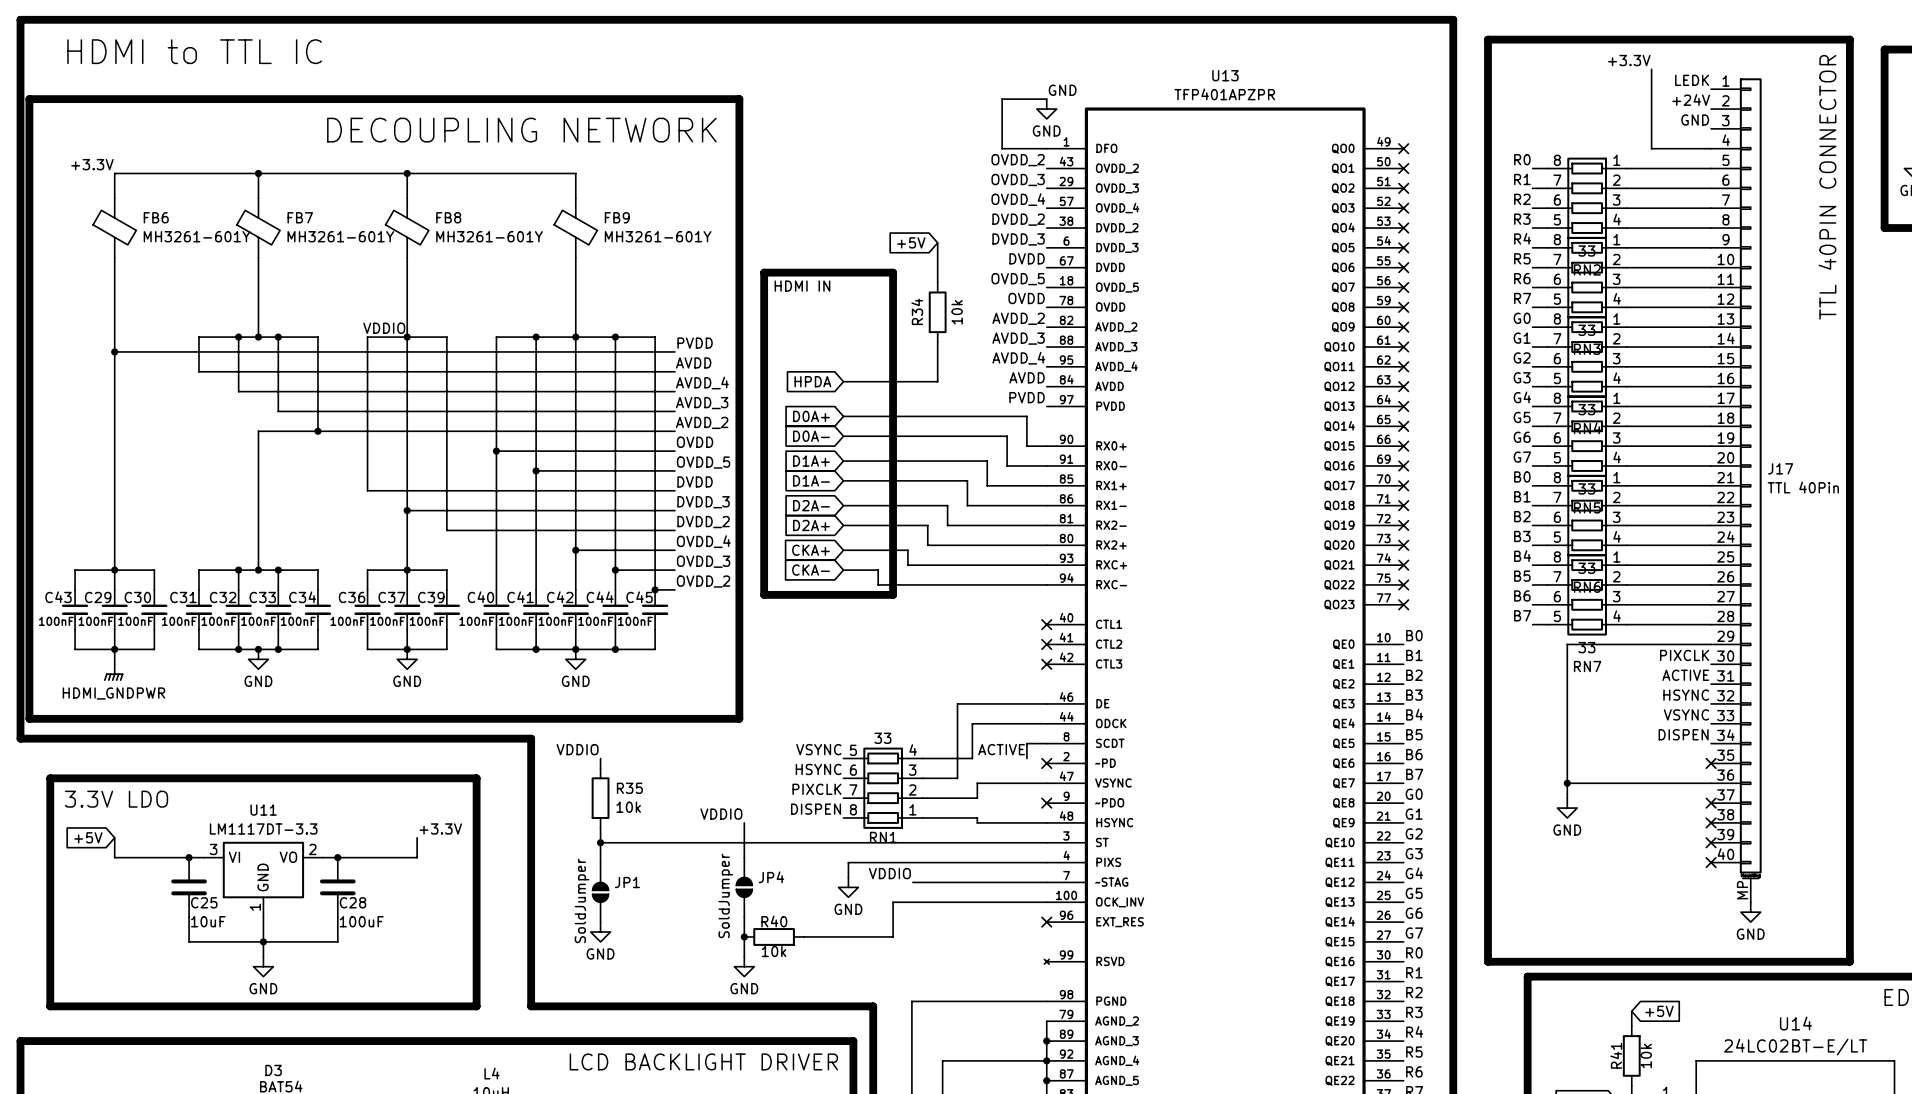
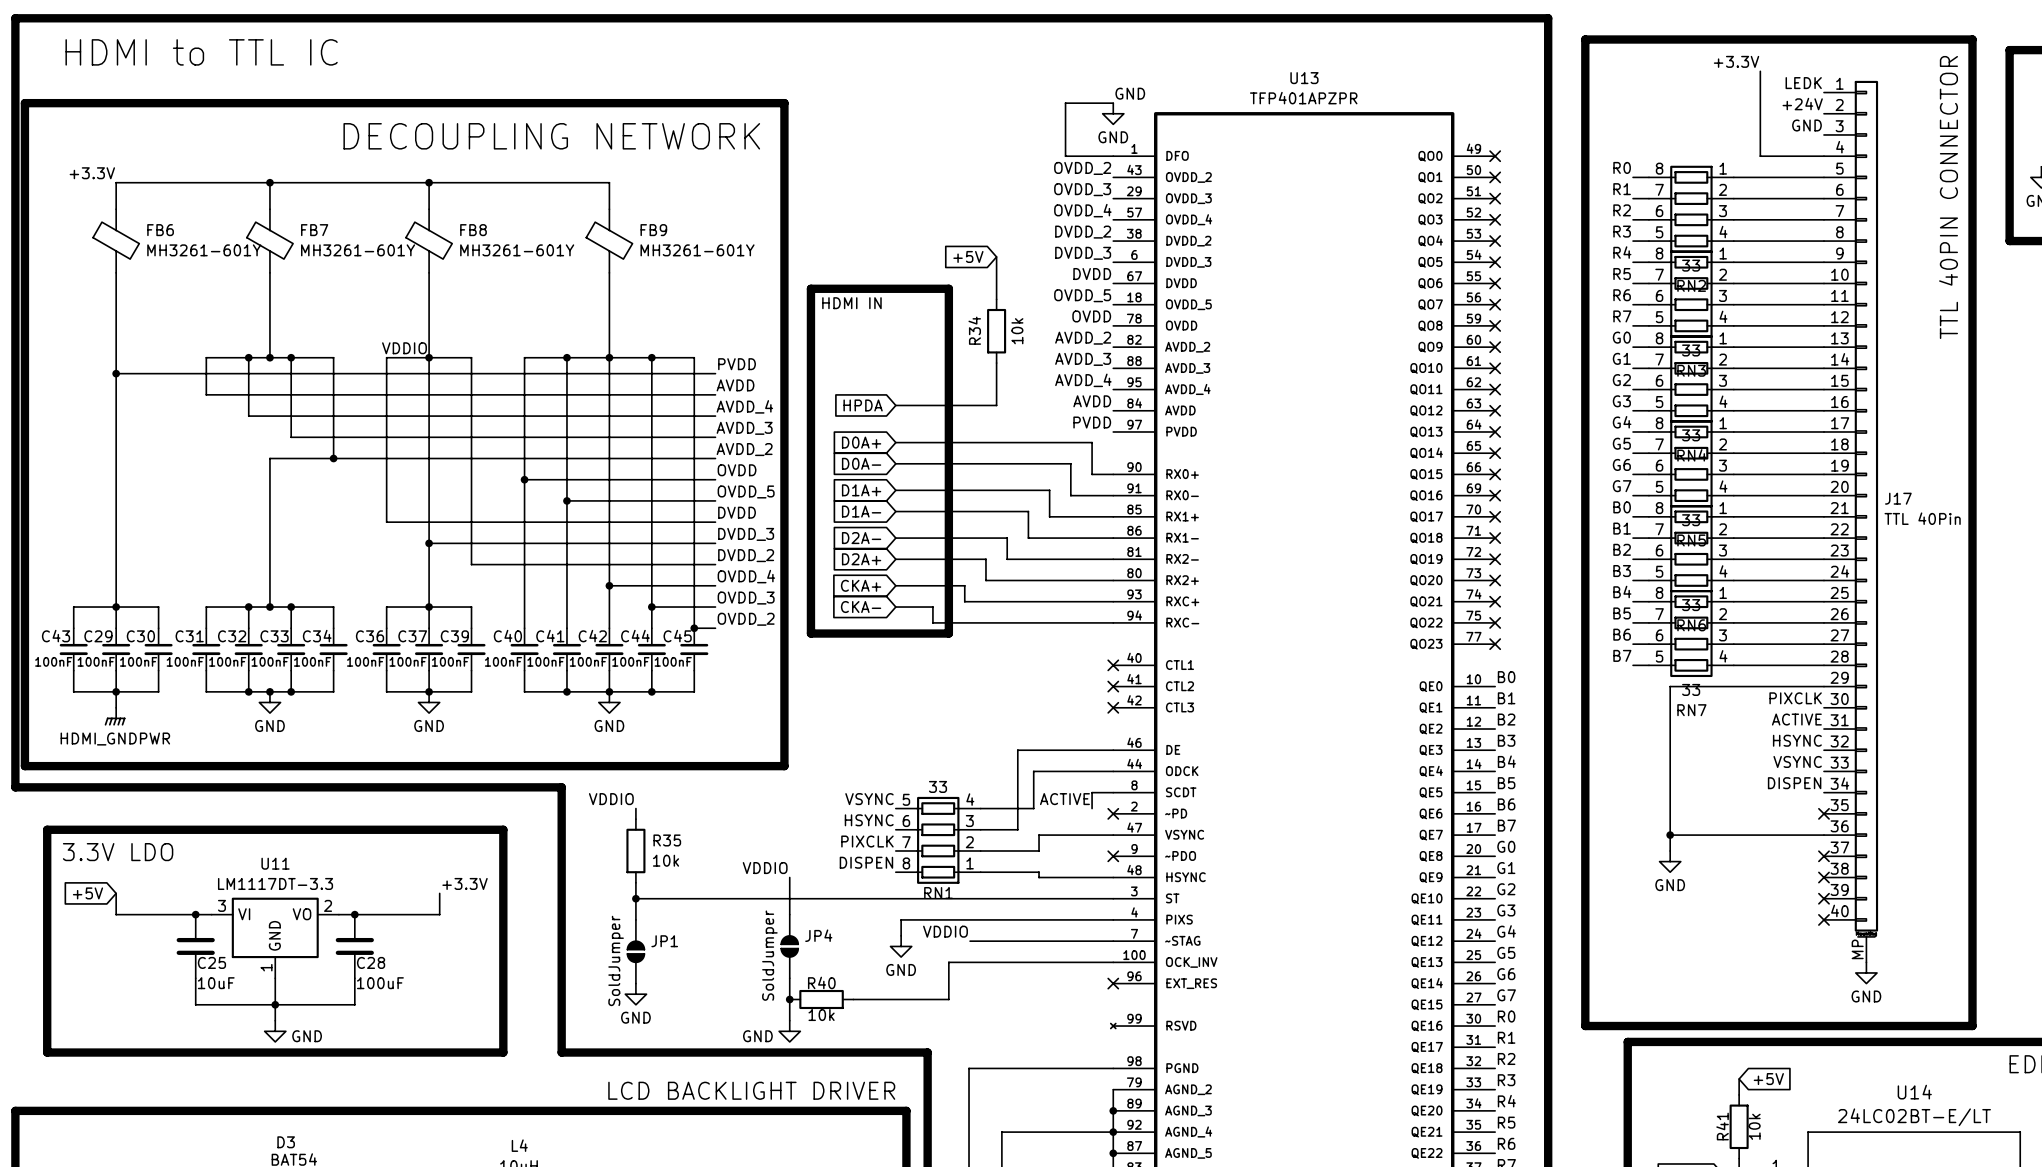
line: (50, 986) (50, 1006) (476, 1006) (476, 986) -> (47, 1052) (503, 1052)
line: (531, 986) (531, 1006) (873, 1006) -> (561, 1052) (927, 1052) (927, 1073)
power symbol text position: GND (263, 988) -> GND (307, 1036)
power symbol text position: GND (744, 988) -> GND (757, 1036)
text position: LCD BACKLIGHT DRIVER (703, 1061) -> LCD BACKLIGHT DRIVER (751, 1090)

